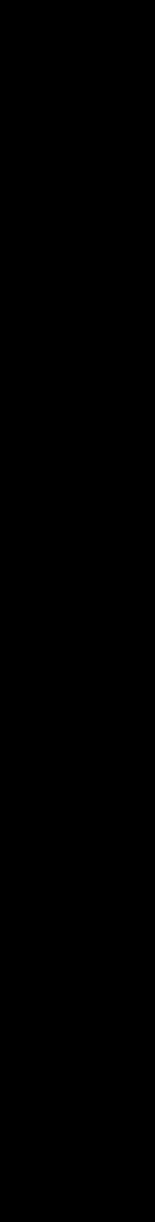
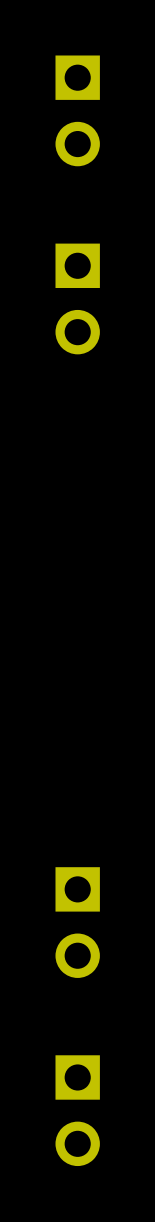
part: none -> (77, 110)
part: none -> (77, 298)
part: none -> (77, 922)
part: none -> (77, 1110)

